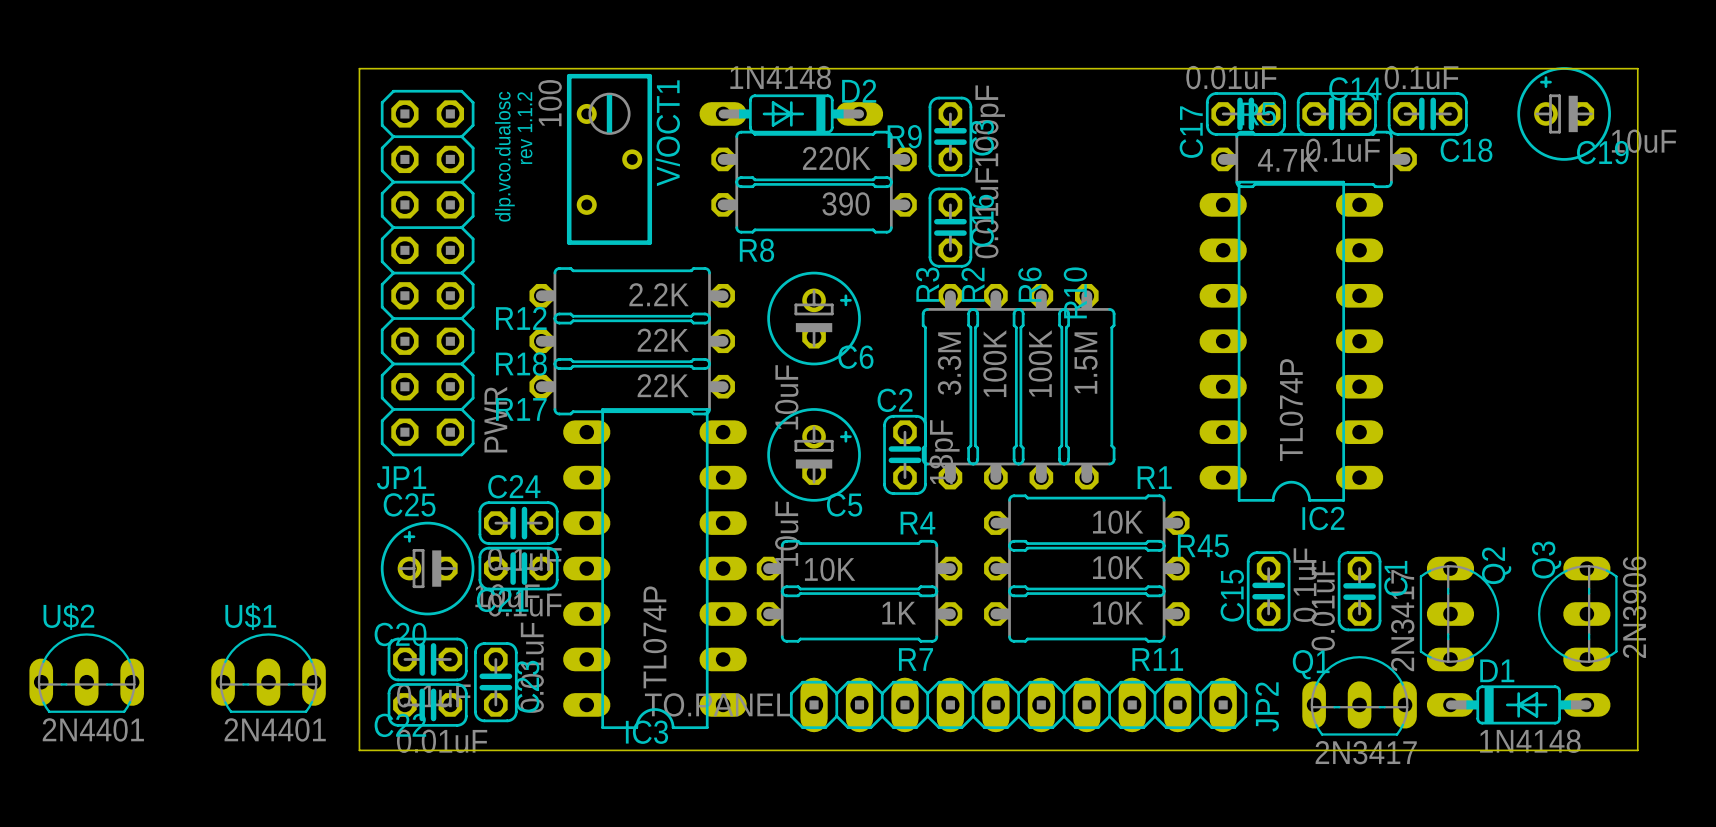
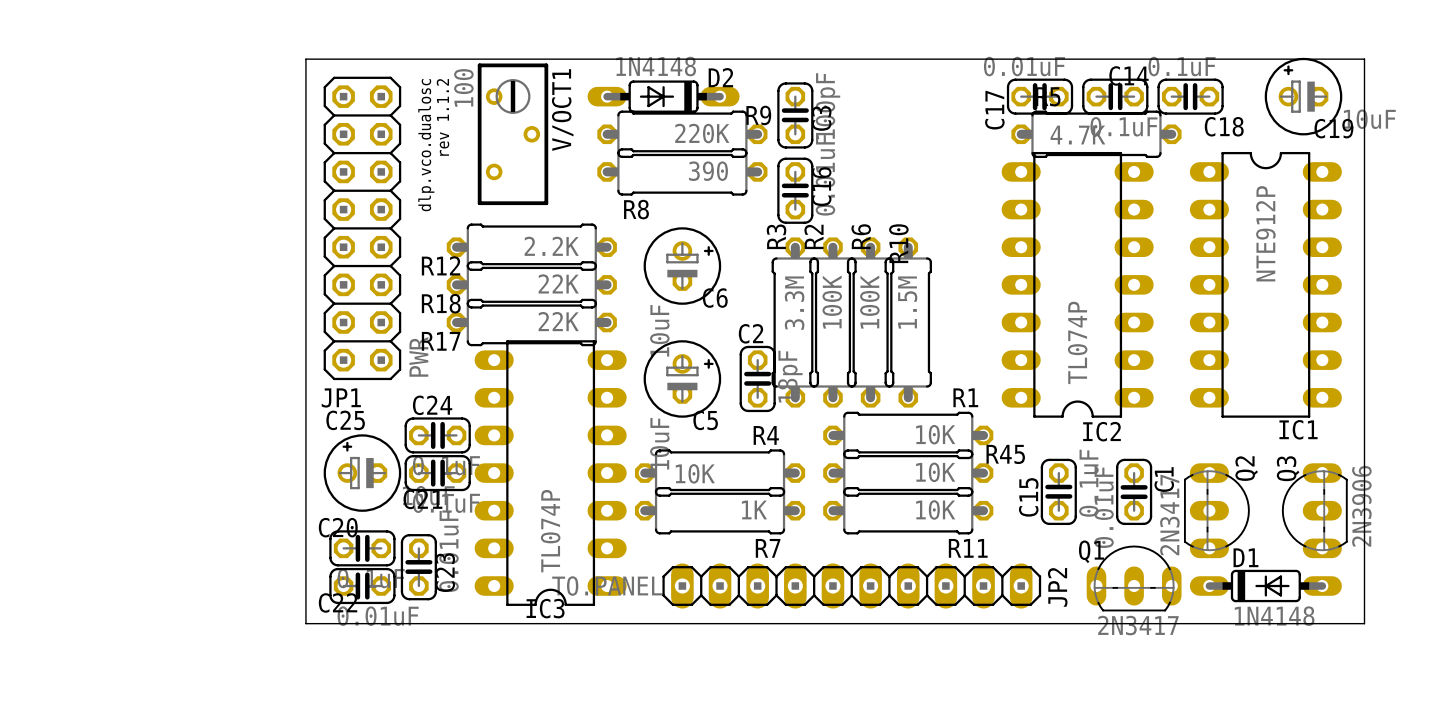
IC1: none -> NTE912P (1265, 284)
U$2: 2N4401 (86, 673) -> none
U$1: 2N4401 (268, 673) -> none

